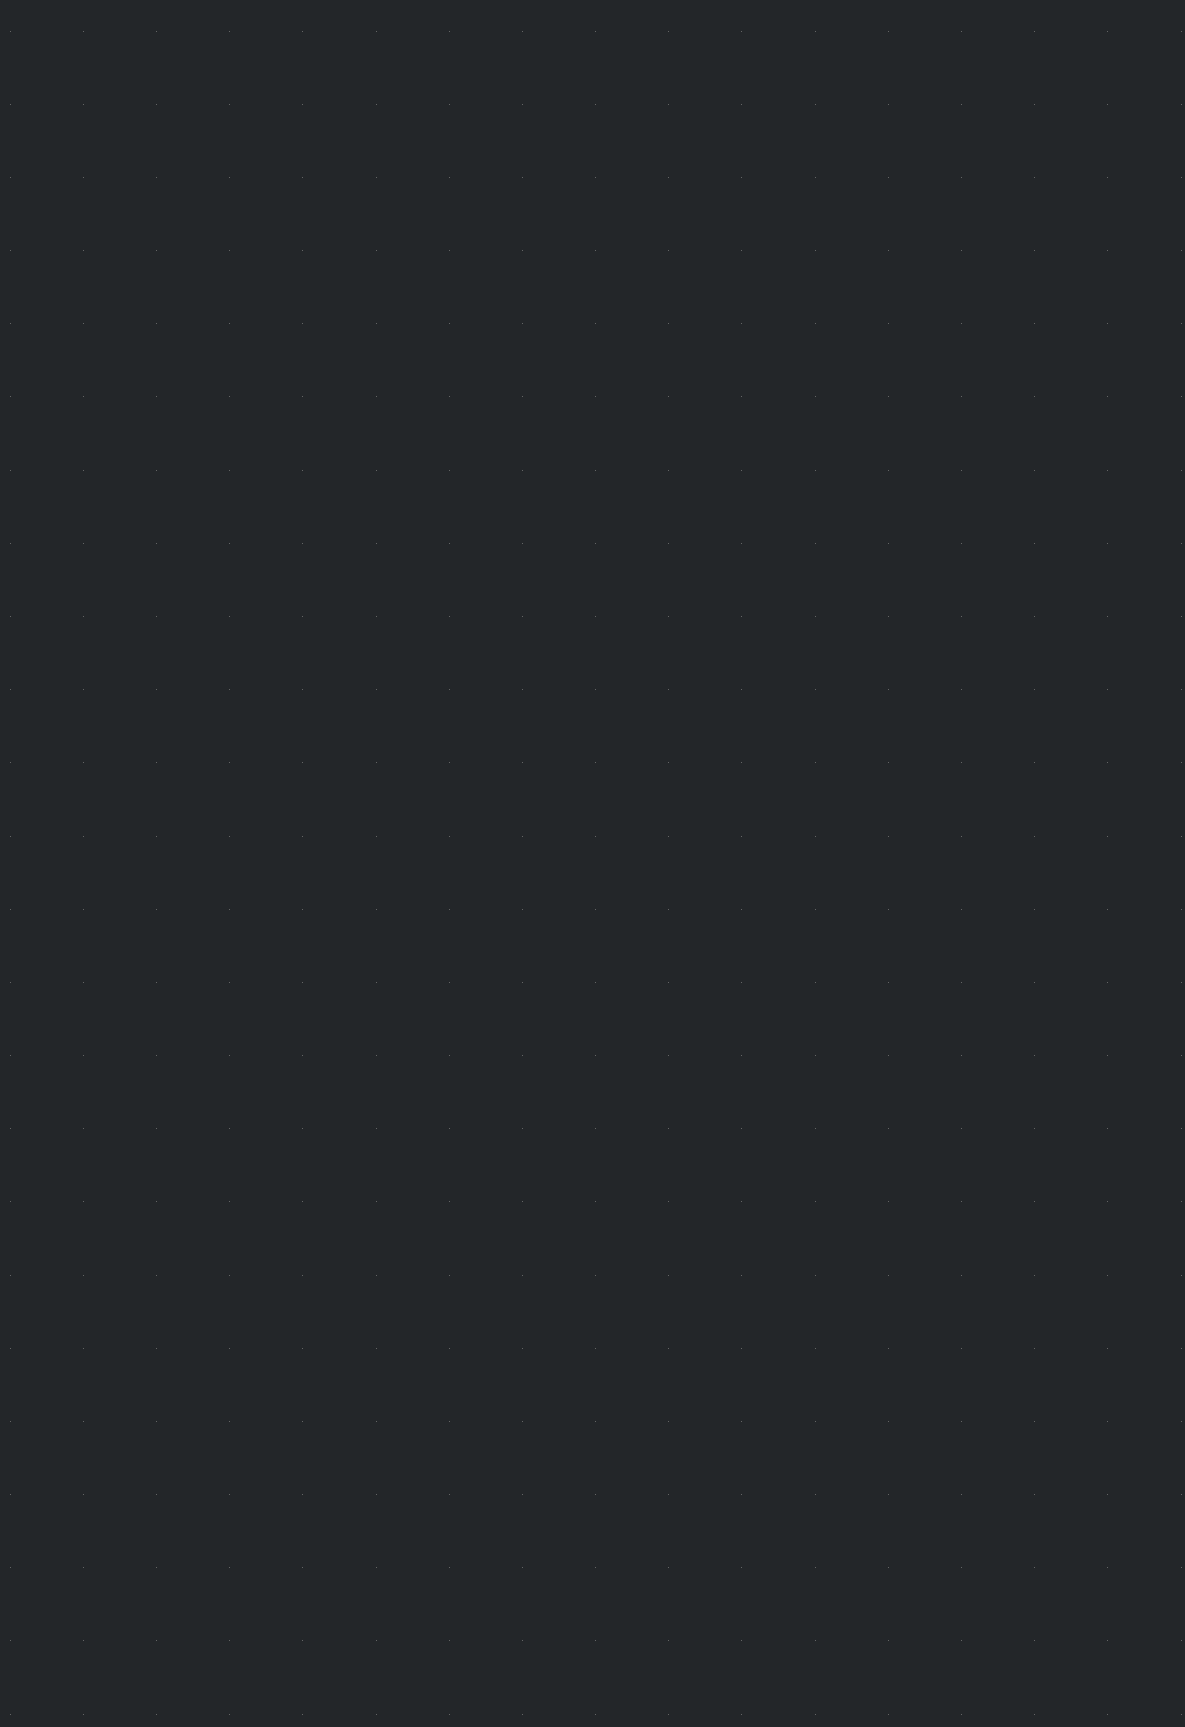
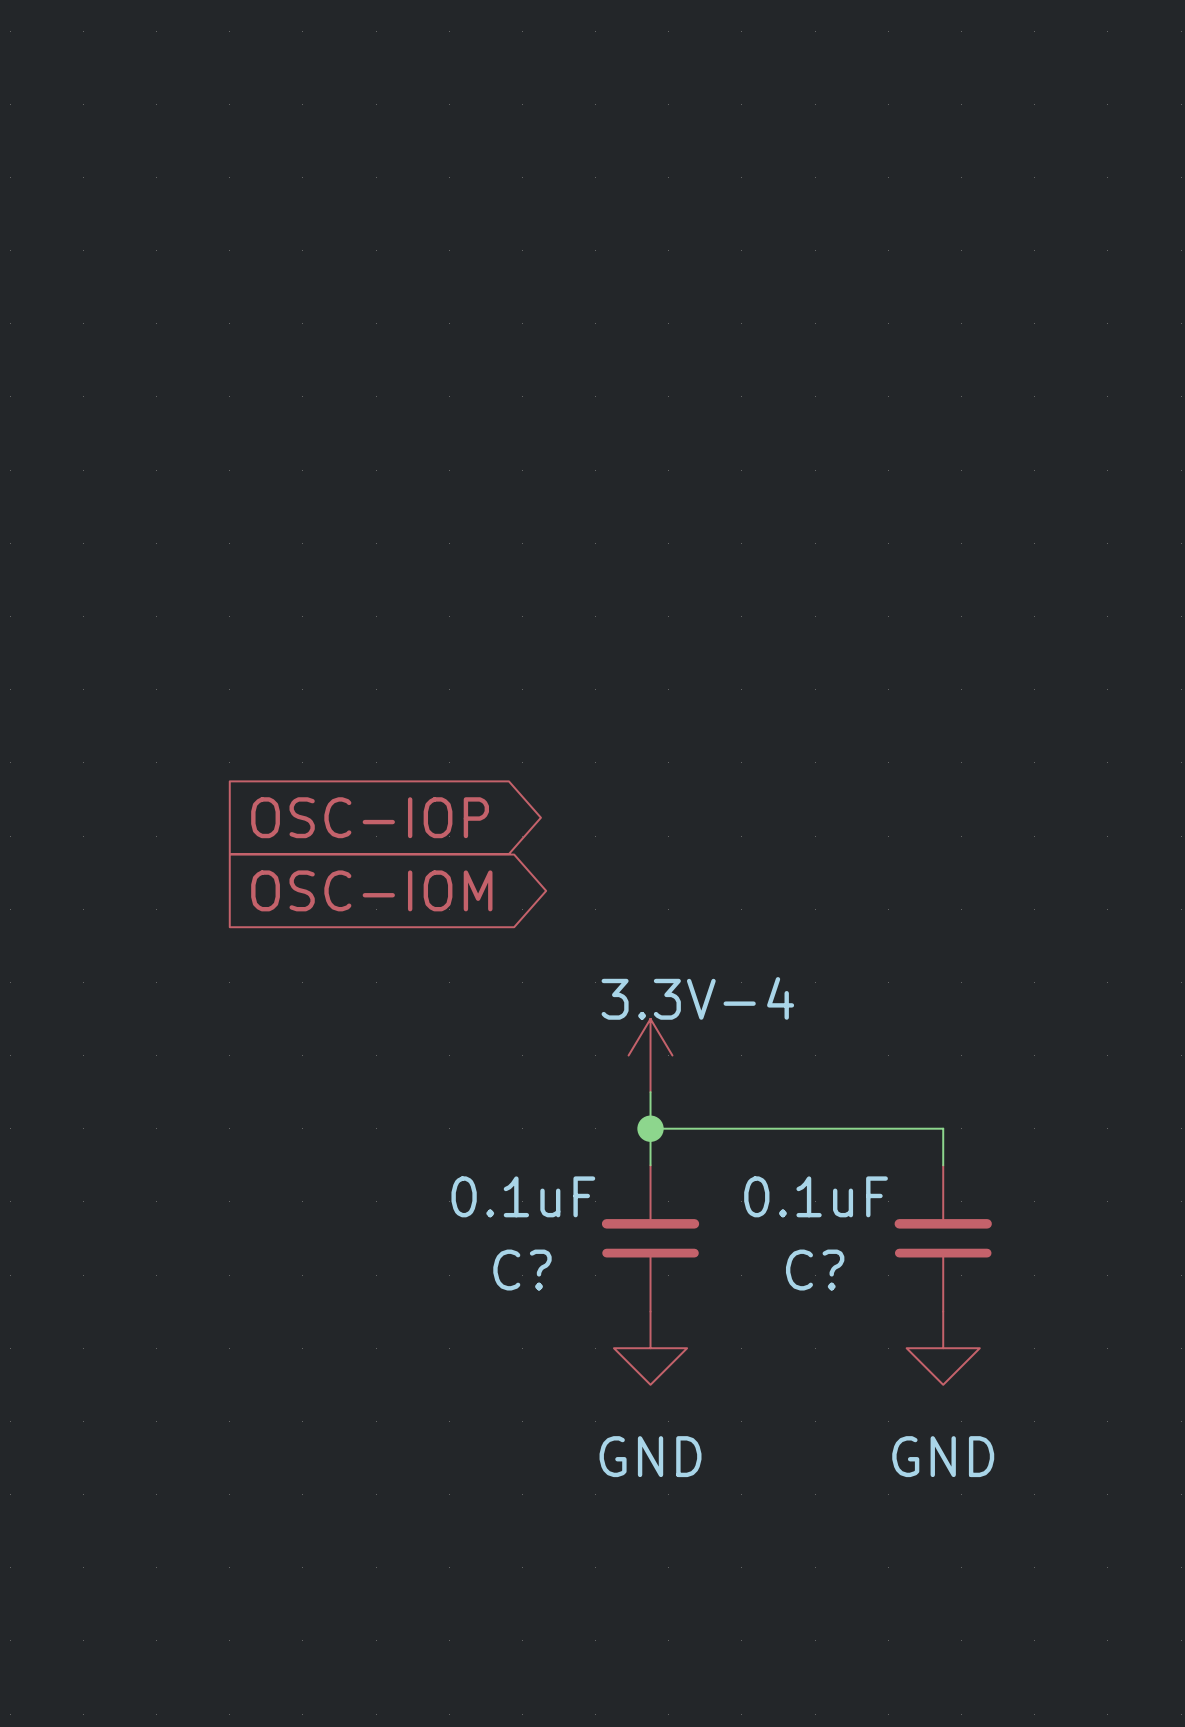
global label: none -> OSC-IOP (370, 817)
global label: none -> OSC-IOM (371, 890)
power symbol: none -> 3.3V-4 (650, 1055)
wire: none -> (650, 1092) (650, 1165)
wire: none -> (650, 1128) (943, 1128) (943, 1165)
junction: none -> (650, 1128)
C?: none -> 0.1uF (650, 1238)
C?: none -> 0.1uF (943, 1238)
power symbol: none -> GND (650, 1348)
power symbol: none -> GND (943, 1348)

